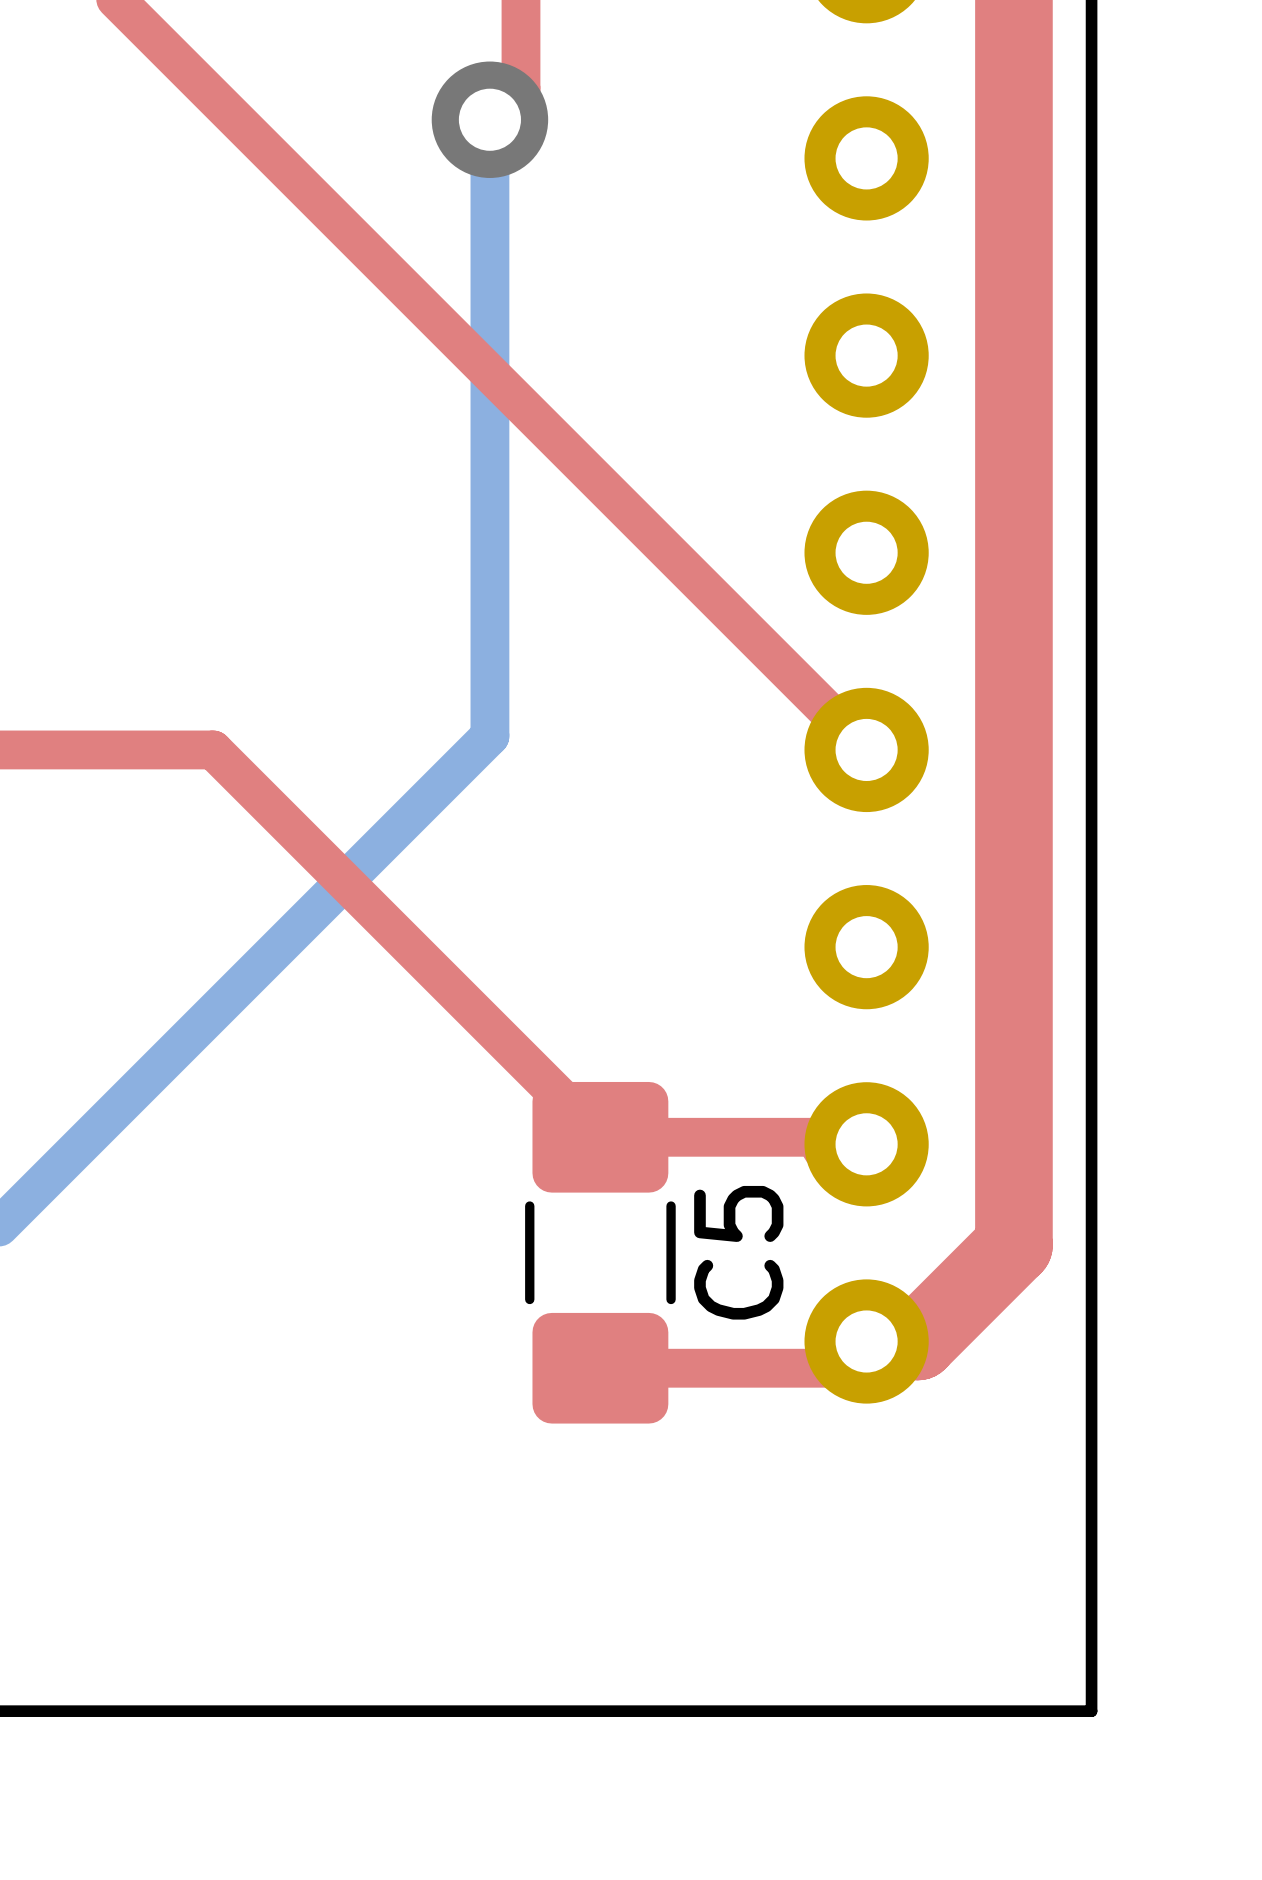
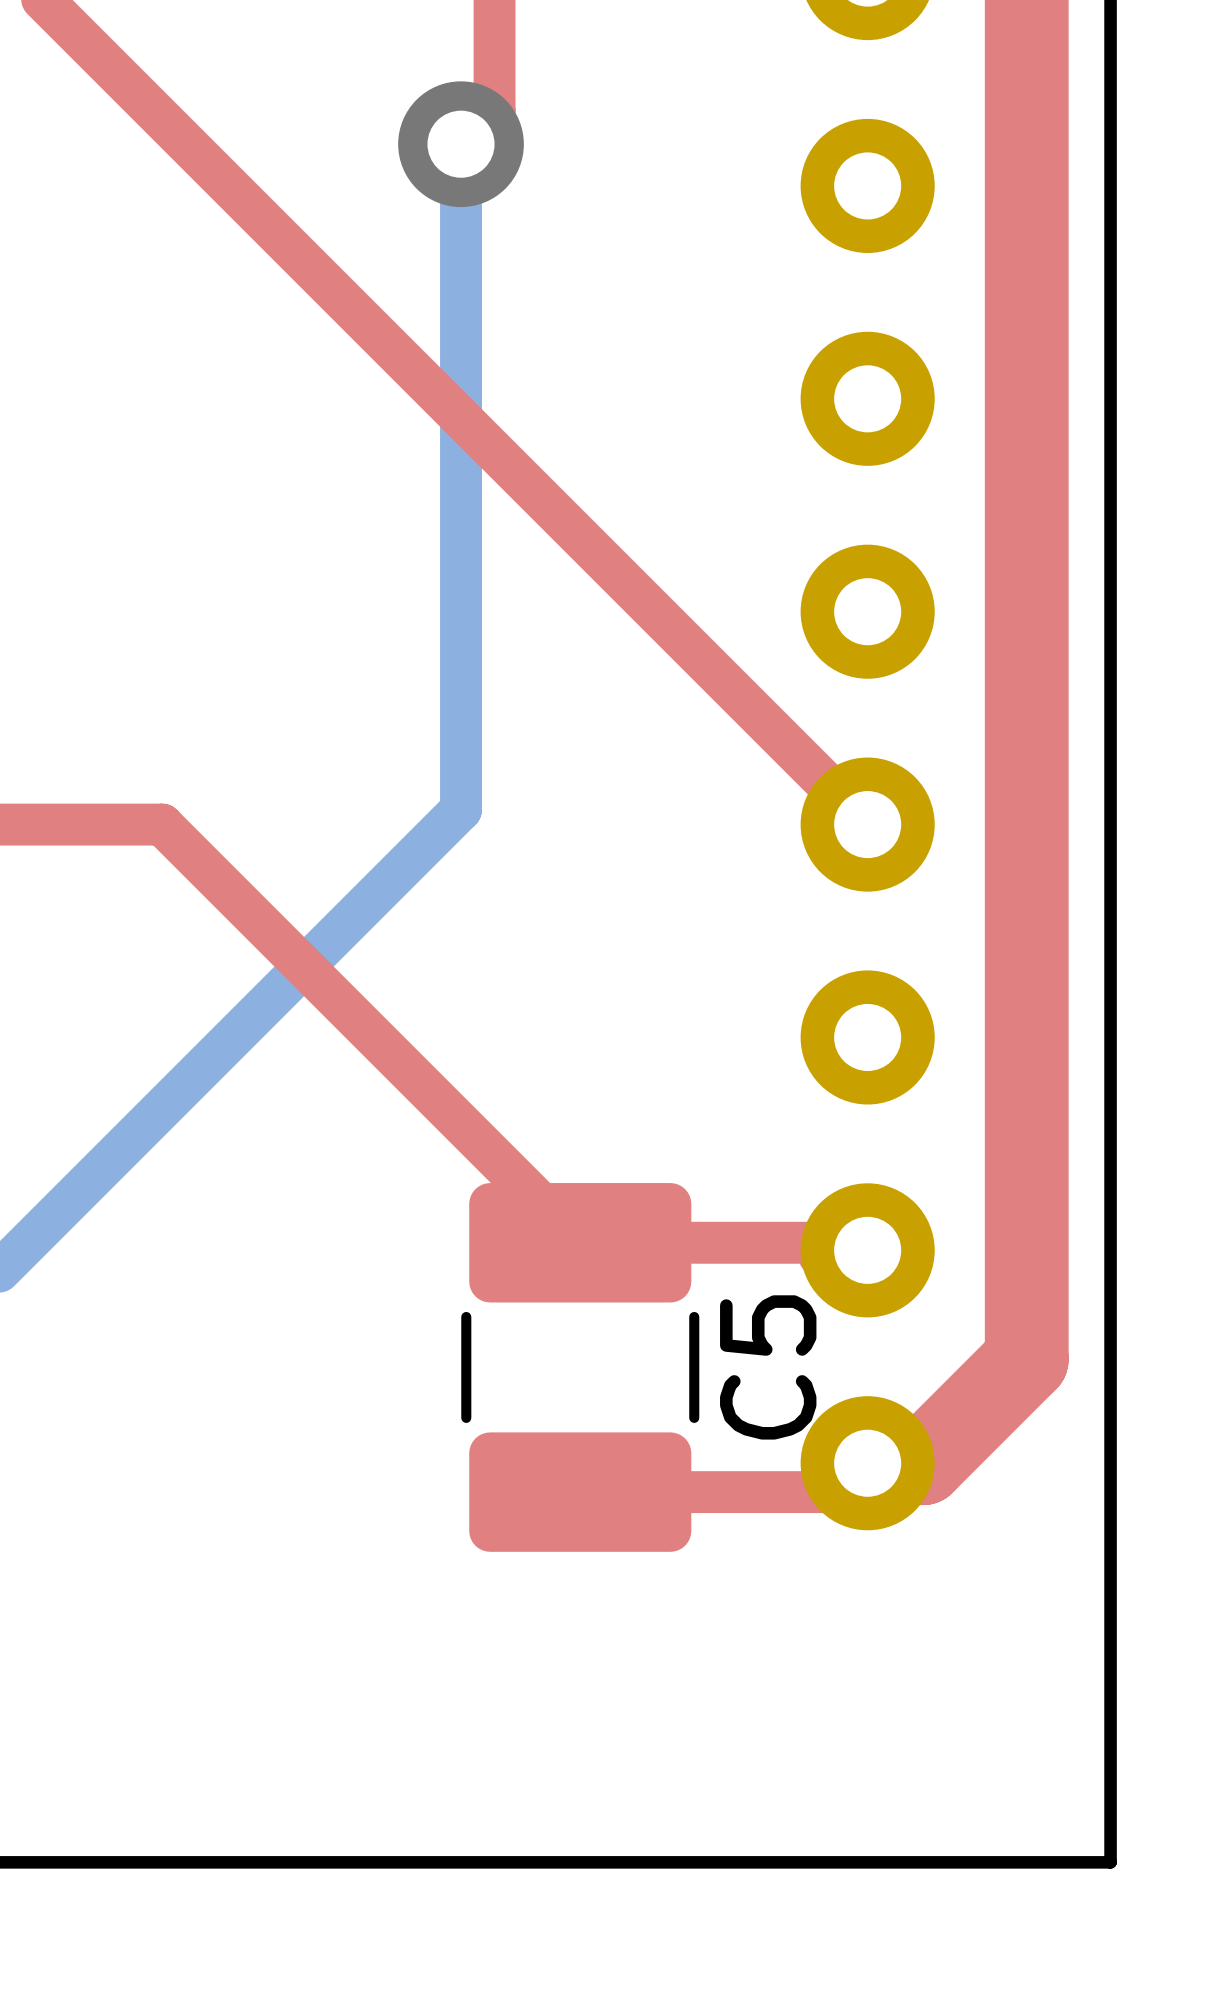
C5 footprint: [525, 1081, 676, 1424] -> [461, 1183, 700, 1552]
C5 name position: C5 (738, 1252) -> C5 (768, 1367)

